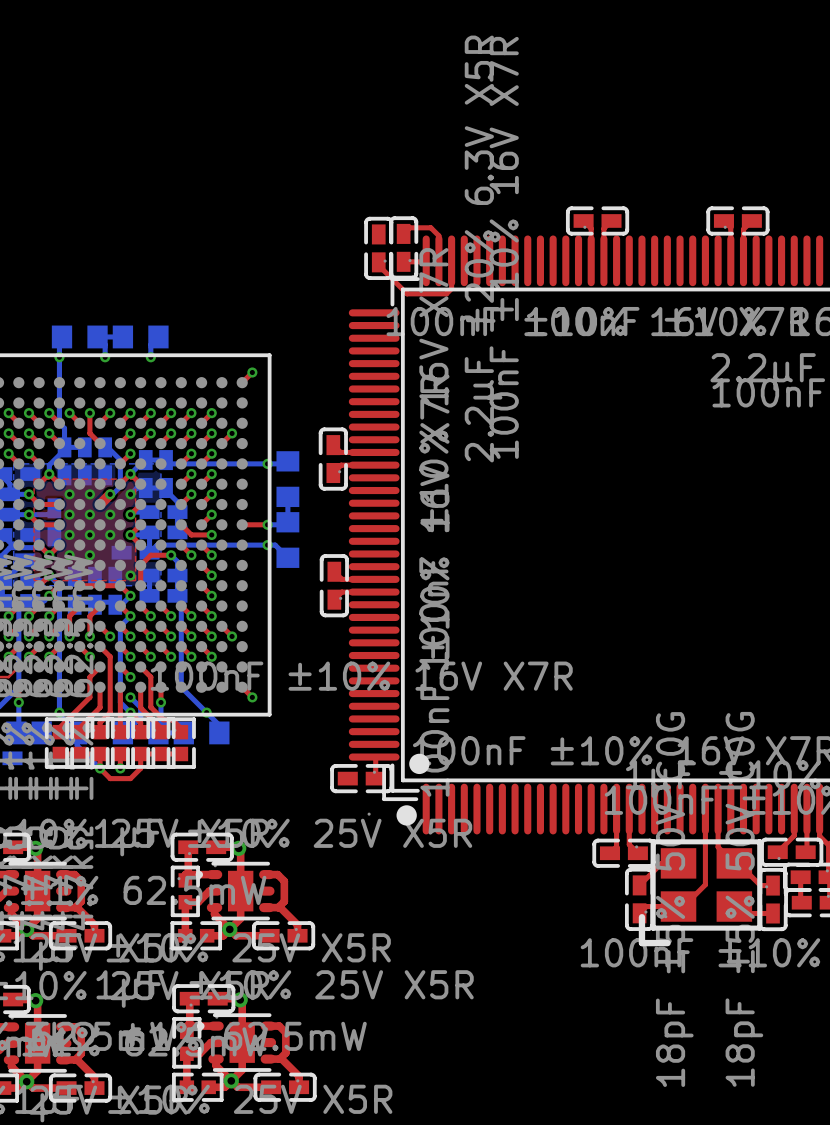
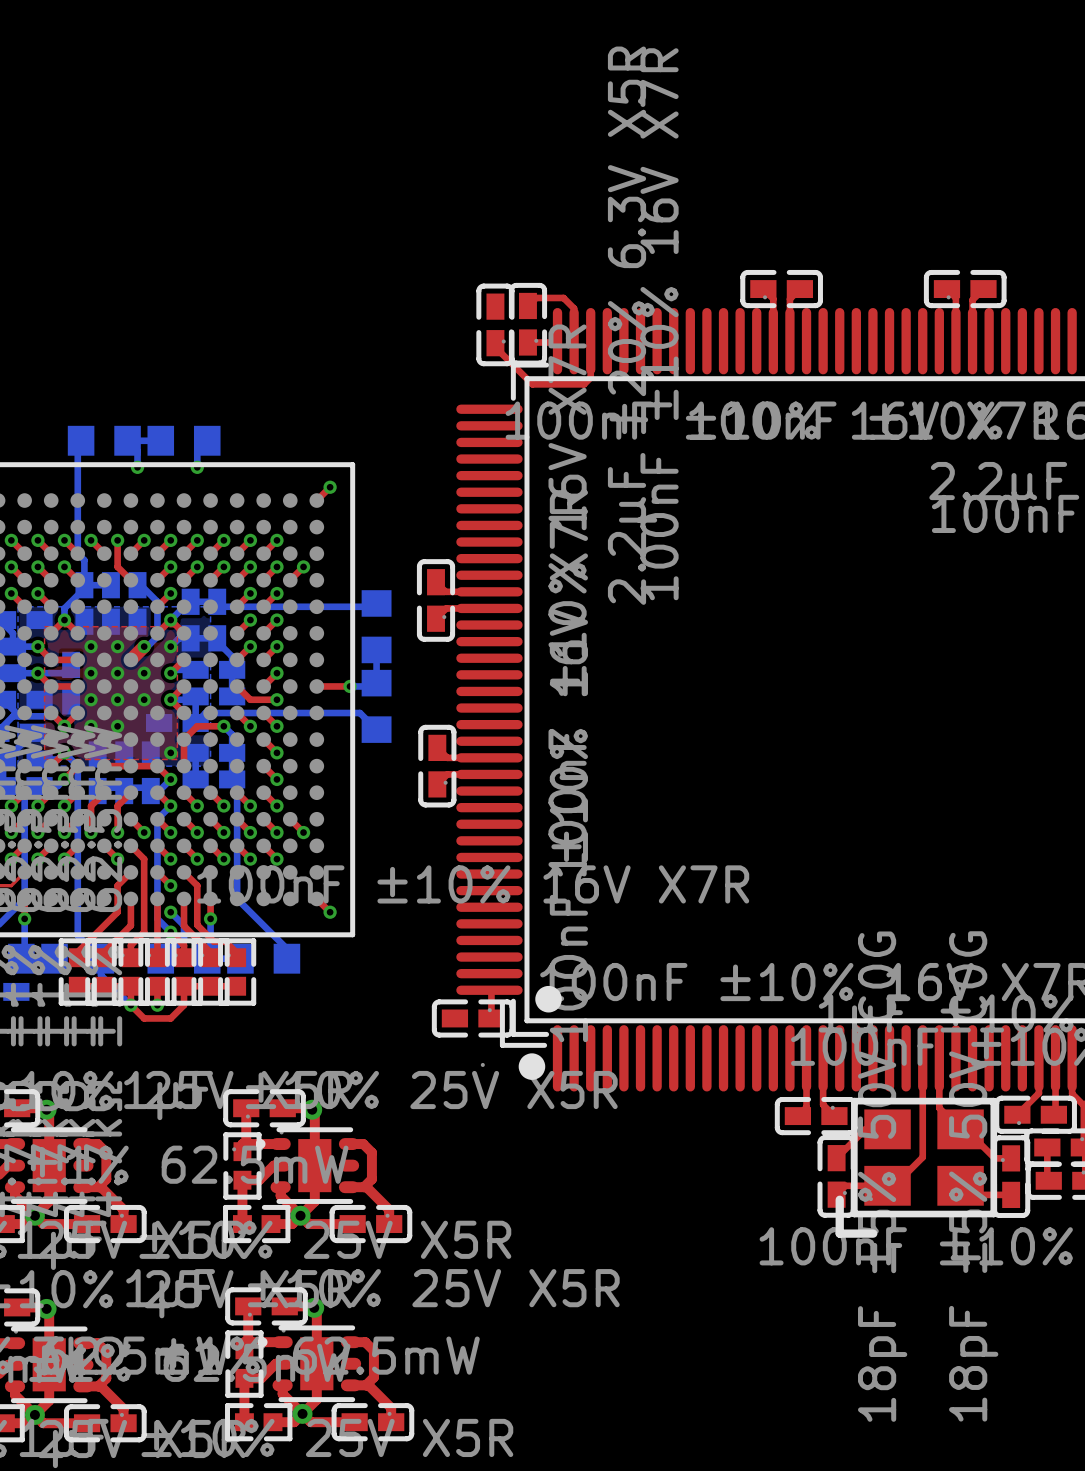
via: (59, 357) -> none
via: (267, 463) -> none
via: (267, 545) -> none
via: (59, 712) -> none
via: (206, 712) -> none

